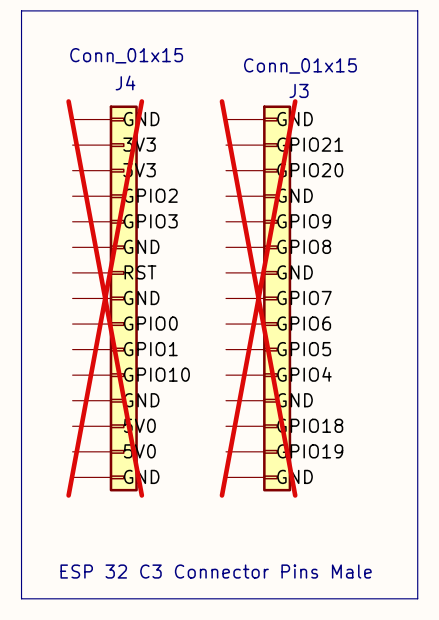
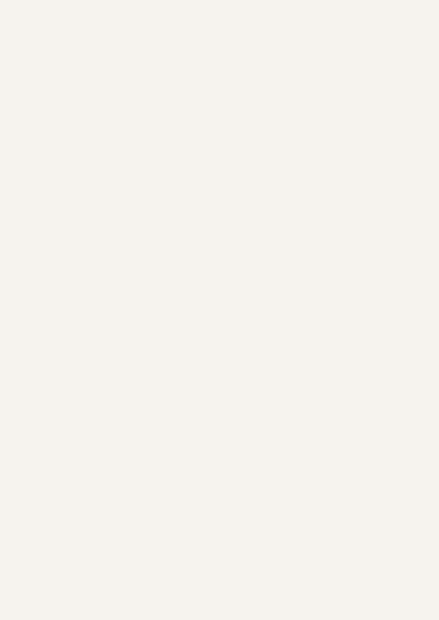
line: (21, 10) (417, 10) (417, 598) (21, 598) (21, 10) -> none
J4: Conn_01x15 (105, 298) -> none
J3: Conn_01x15 (258, 298) -> none
text: ESP 32 C3 Connector Pins Male (216, 571) -> none

